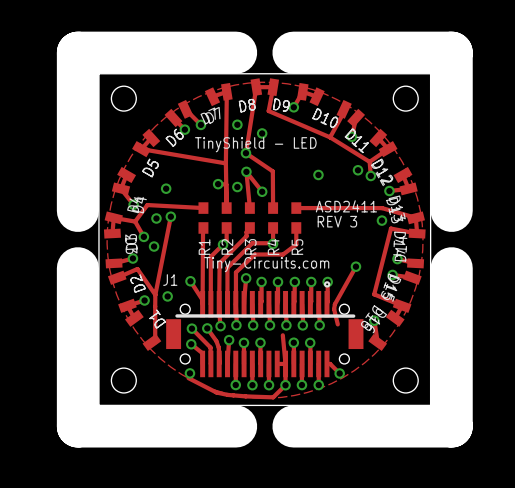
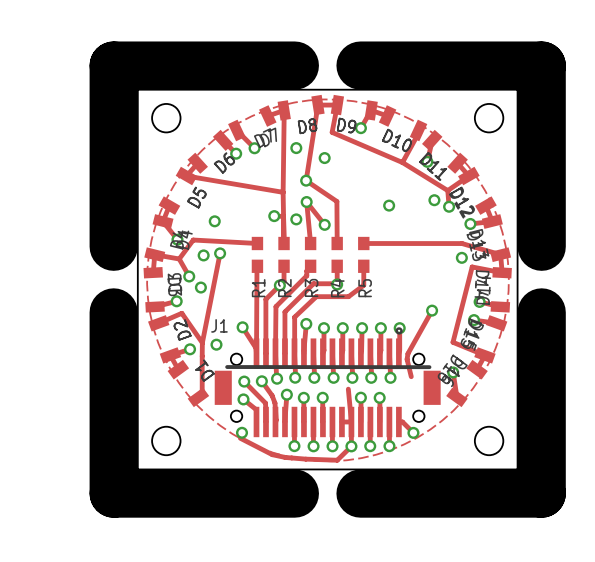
text: TinyShield - LED (255, 144) -> none
text: ASD2411 (346, 206) -> none
text: REV 3 (337, 221) -> none
text: Tiny-Circuits.com (266, 264) -> none

